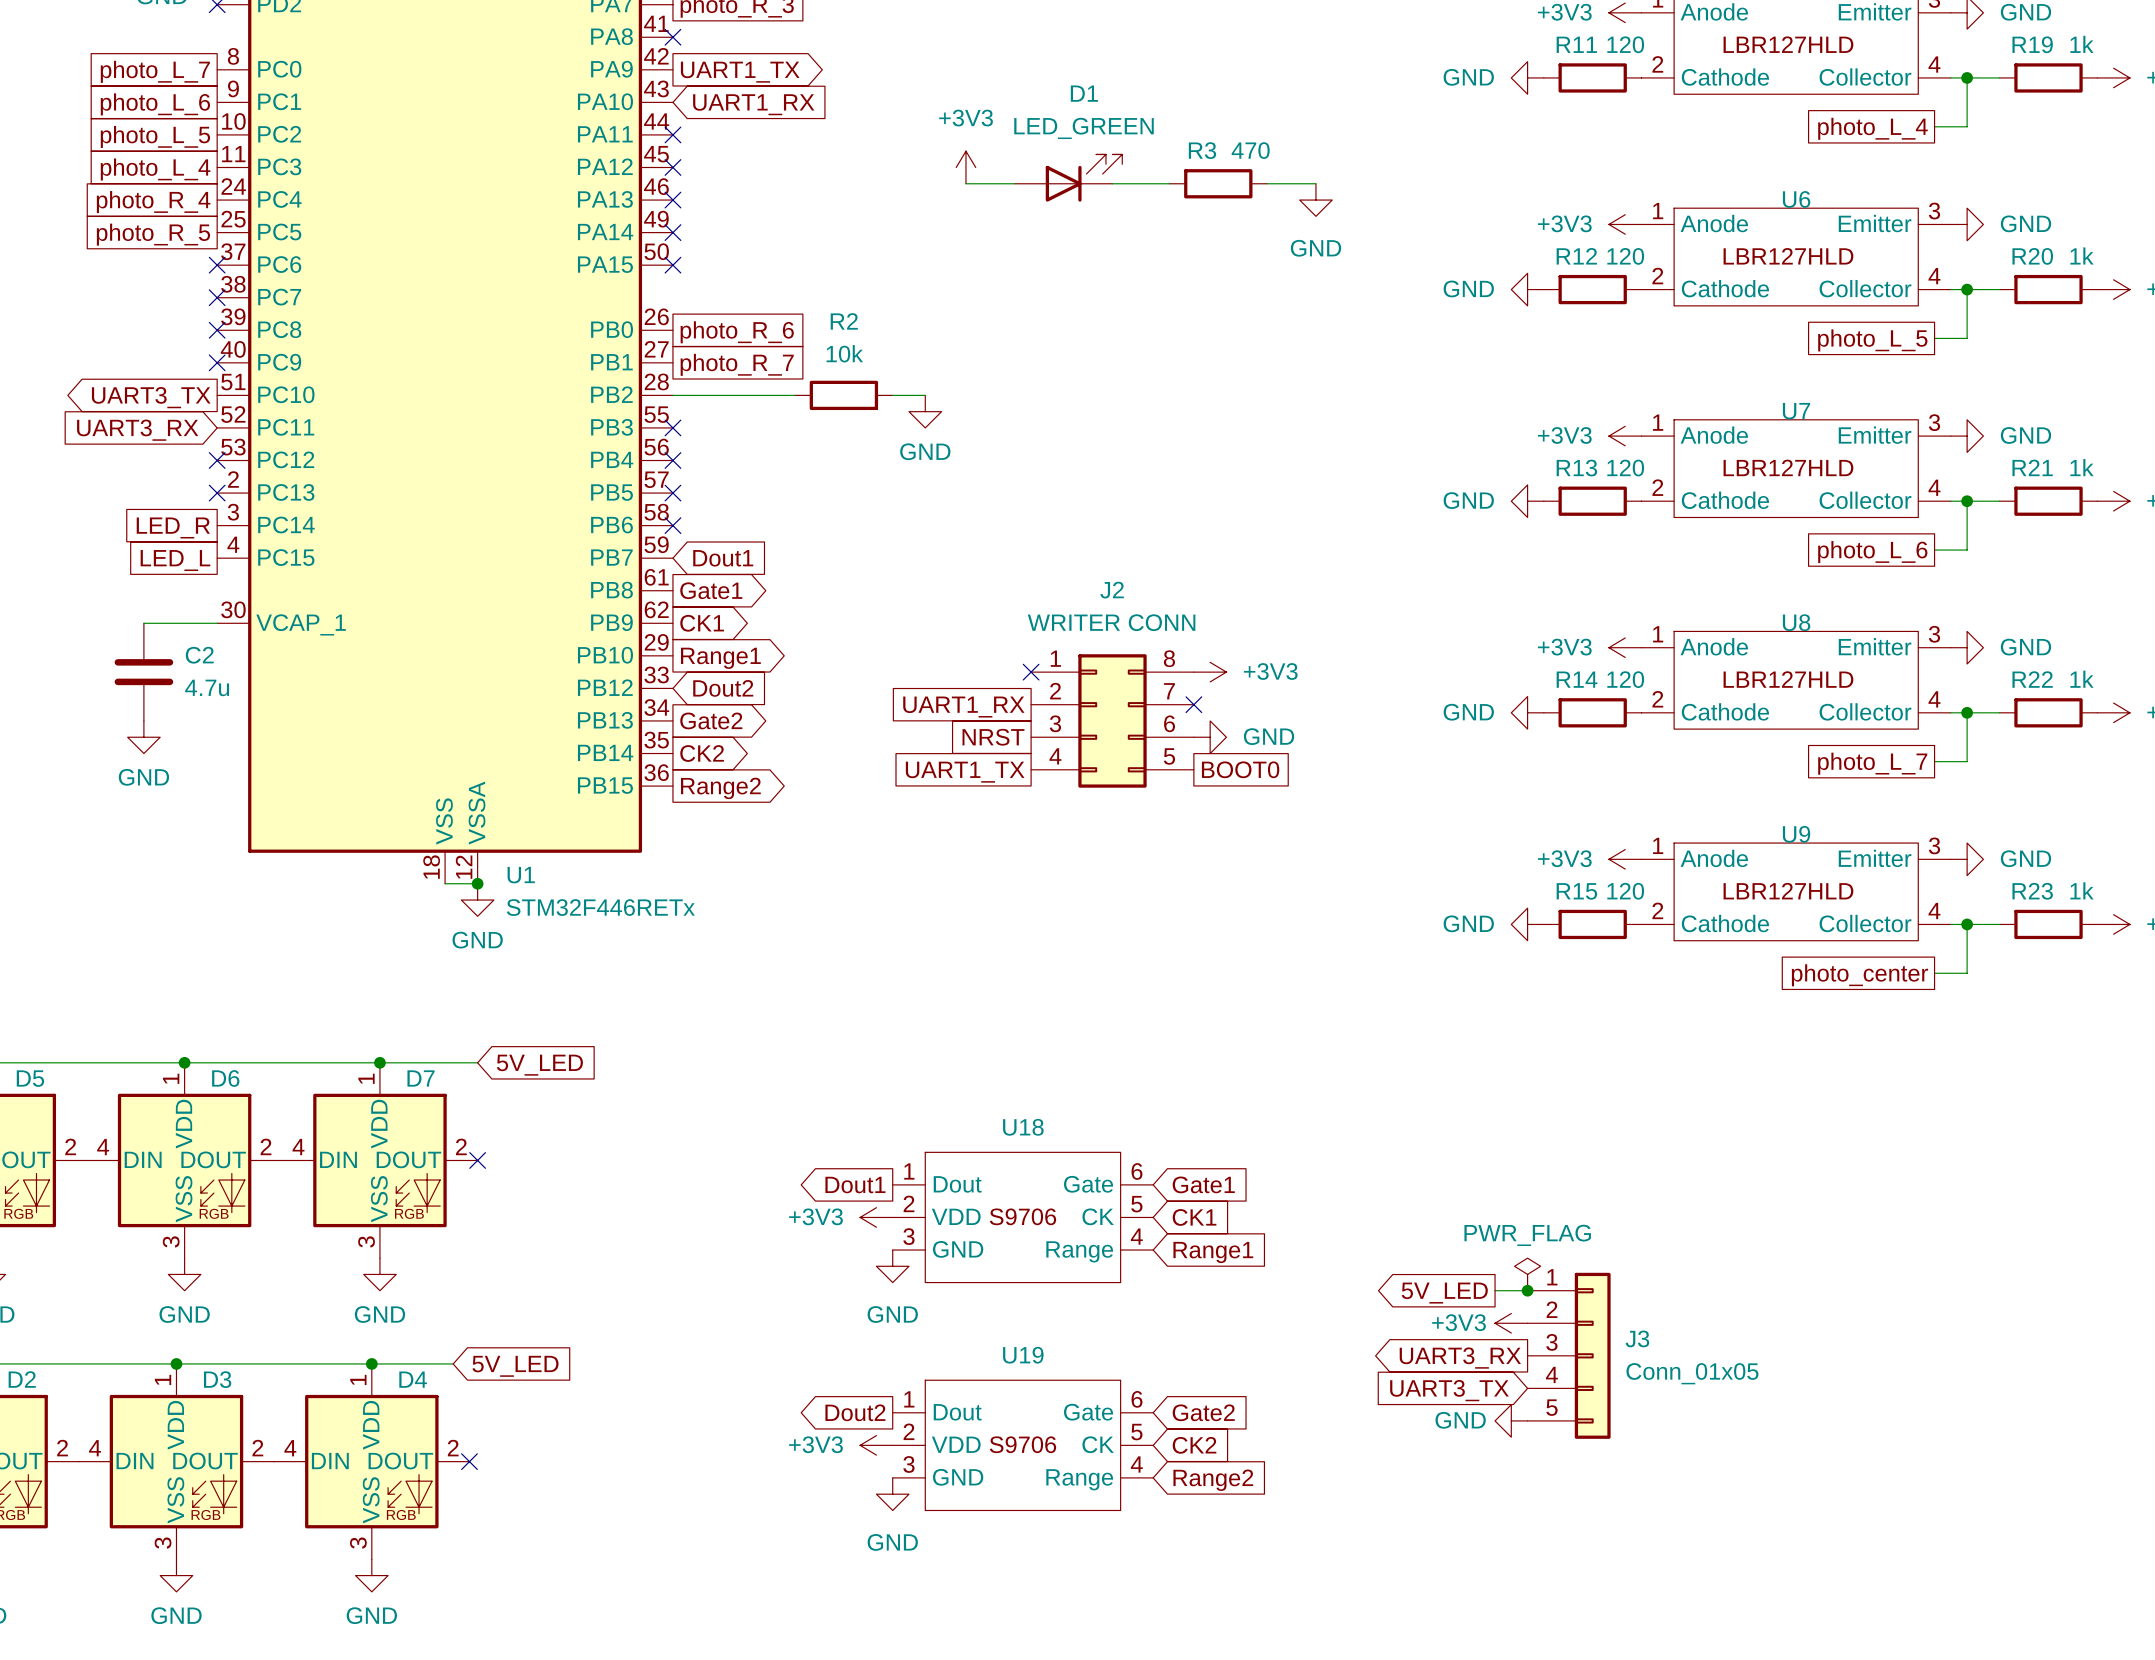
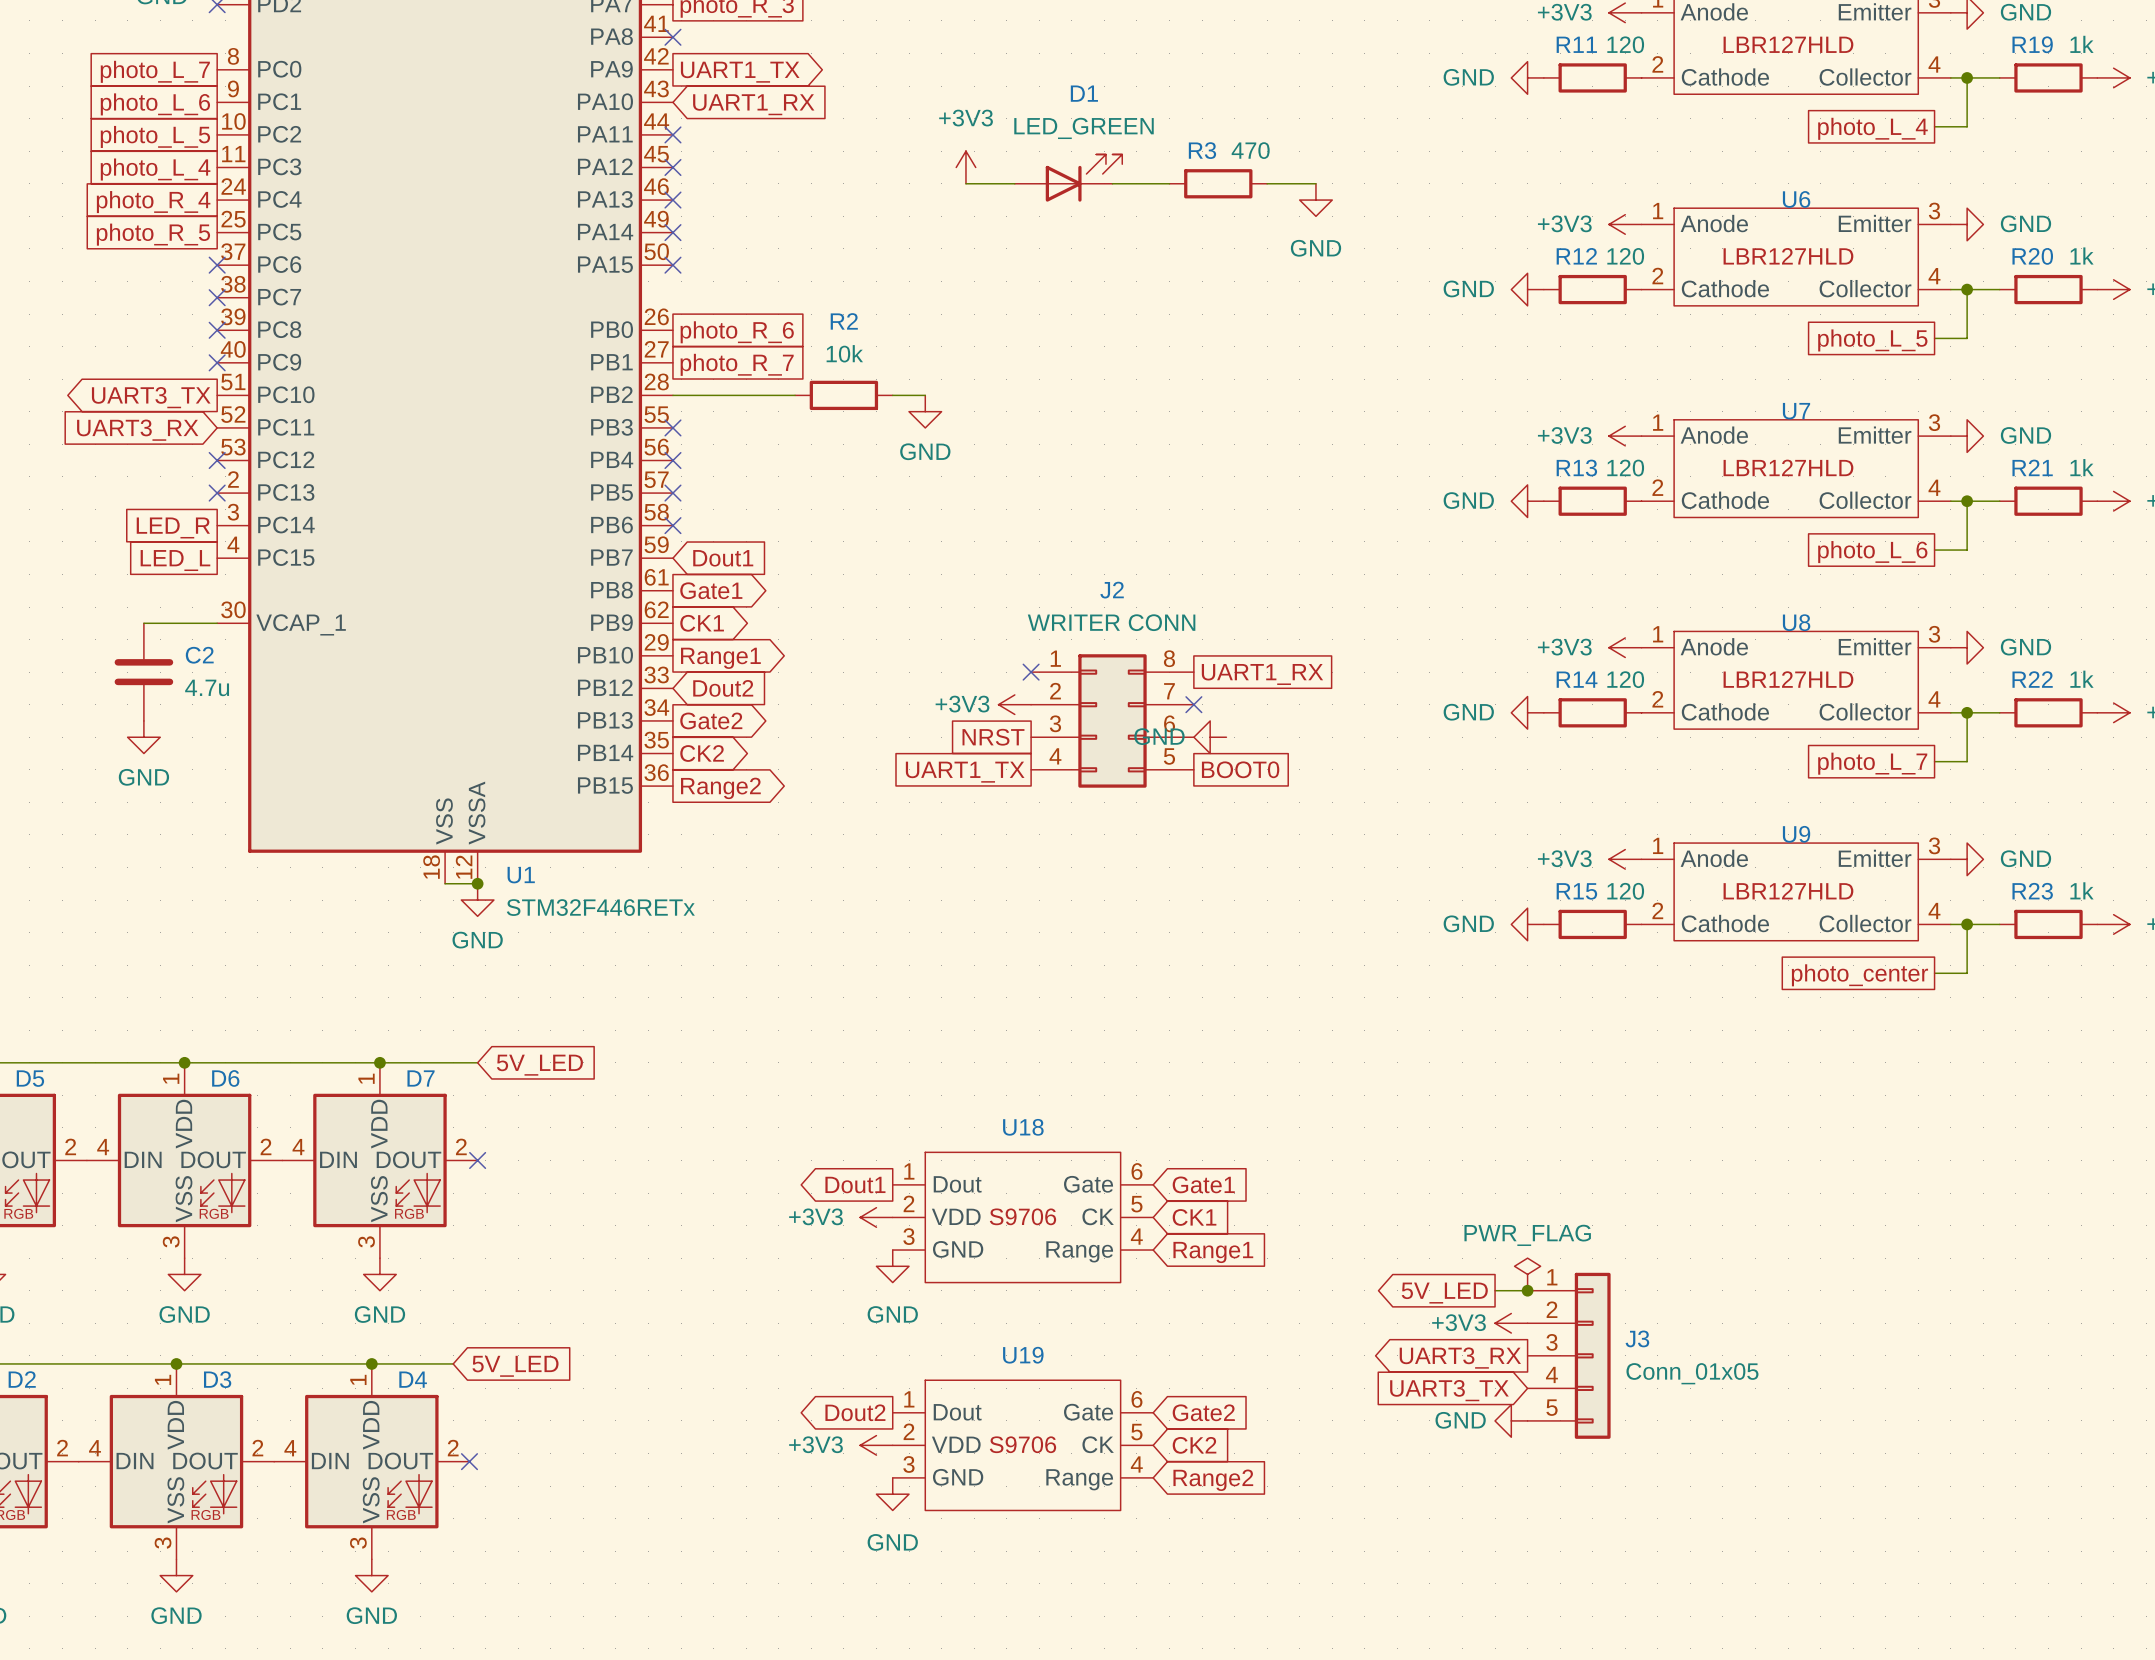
power symbol rotation: 0° (1210, 672) -> 180° (1014, 704)
power symbol position: +3V3 (1210, 672) -> +3V3 (1014, 704)
global label rotation: 0° (963, 707) -> 180° (1262, 674)
global label position: UART1_RX (963, 707) -> UART1_RX (1262, 674)
power symbol rotation: 0° (1210, 737) -> 180° (1210, 737)

